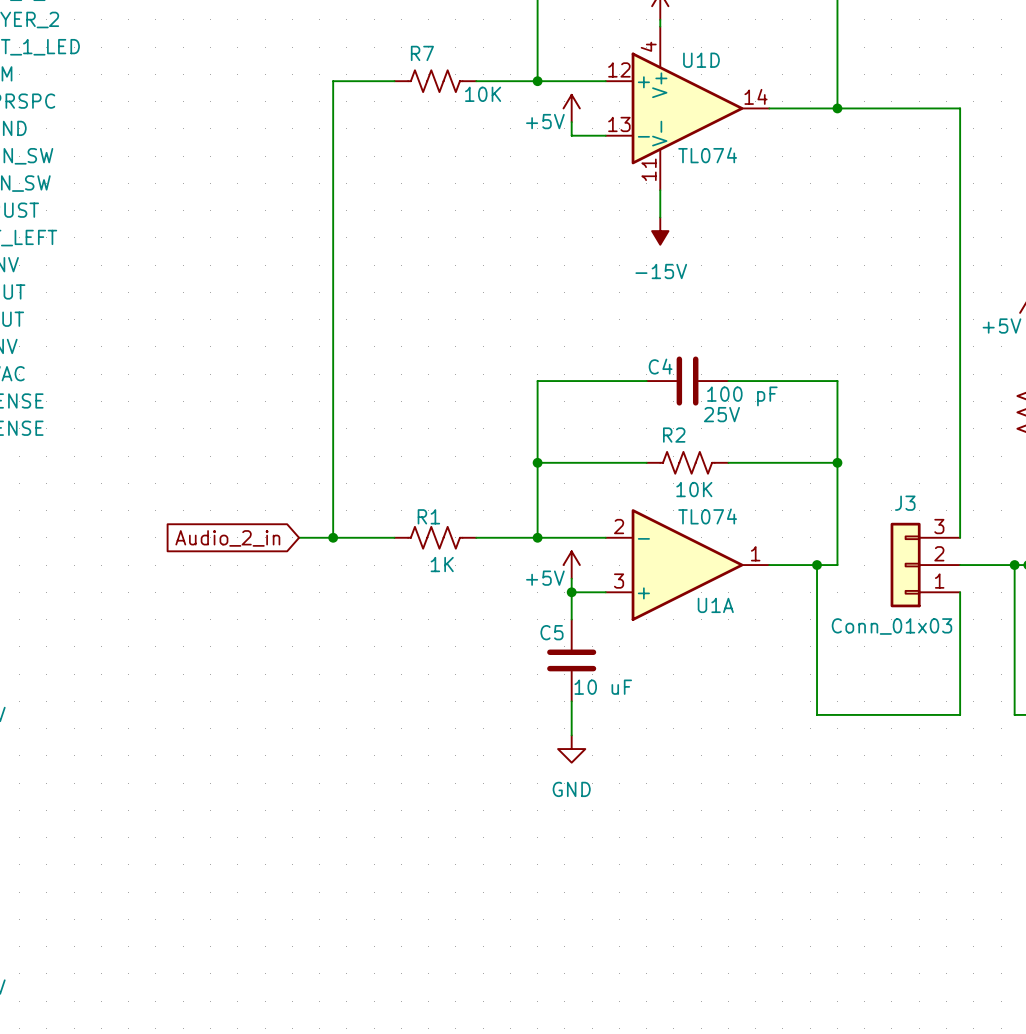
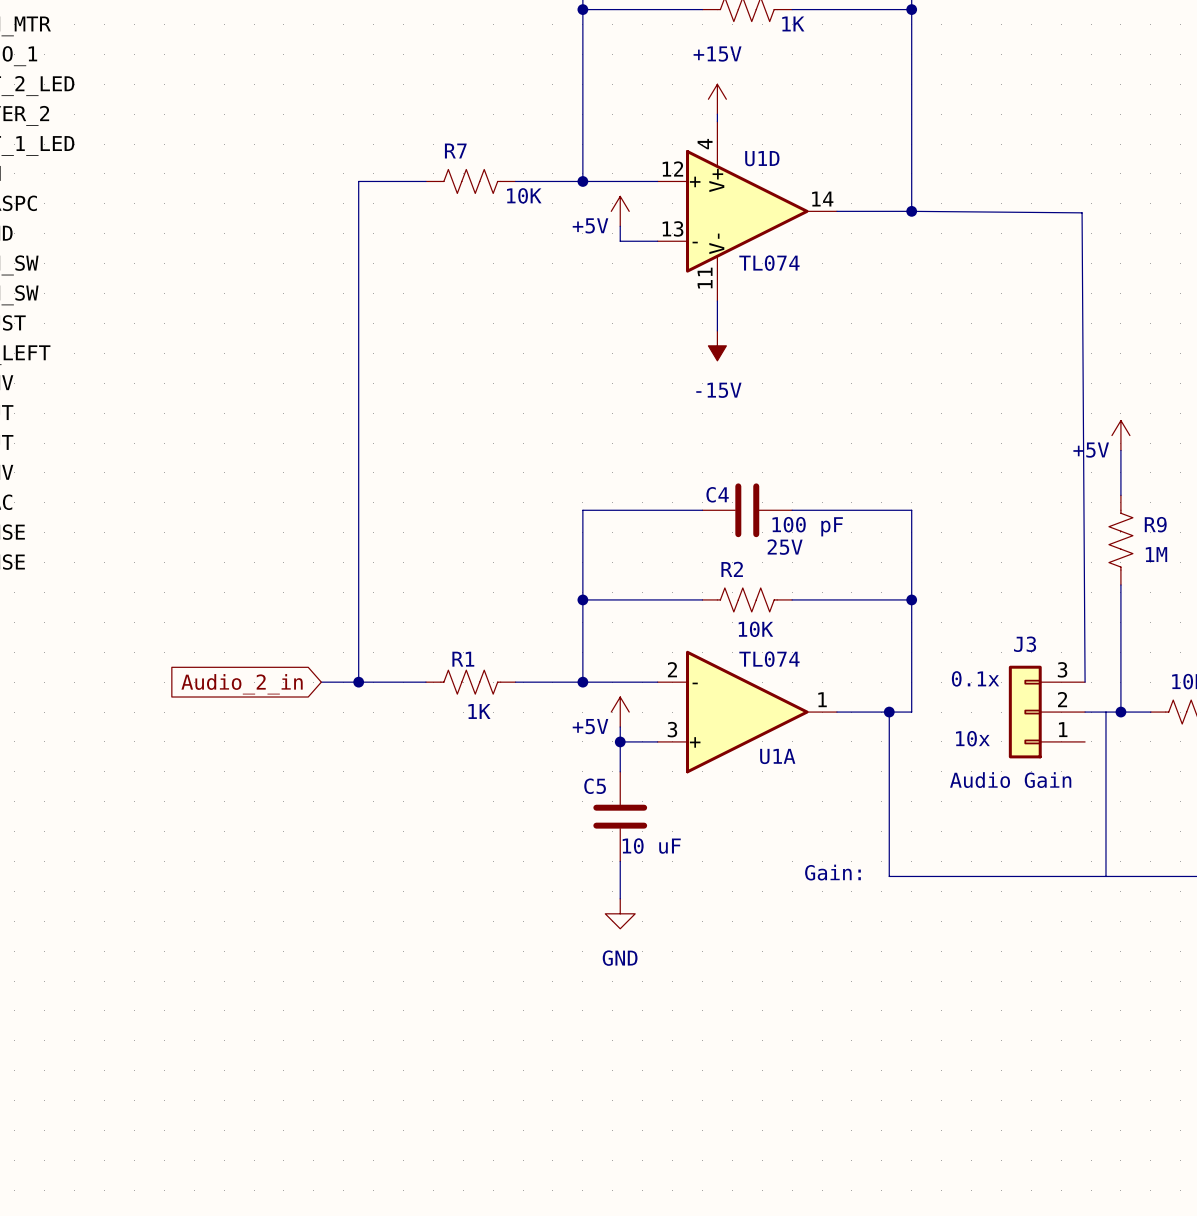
wire: (837, 108) (960, 108) (960, 537) -> (911, 211) (1082, 212) (1085, 682)
text: none -> 0.1x (975, 678)
J3 position: (925, 565) -> (1046, 712)
junction: (1014, 565) -> none
text: none -> 10x (972, 738)
wire: (960, 592) (960, 714) -> (1105, 876) (1046, 876)
J3 value: Conn_01x03 (891, 626) -> Audio Gain (1010, 780)
text: none -> Gain: (832, 872)

